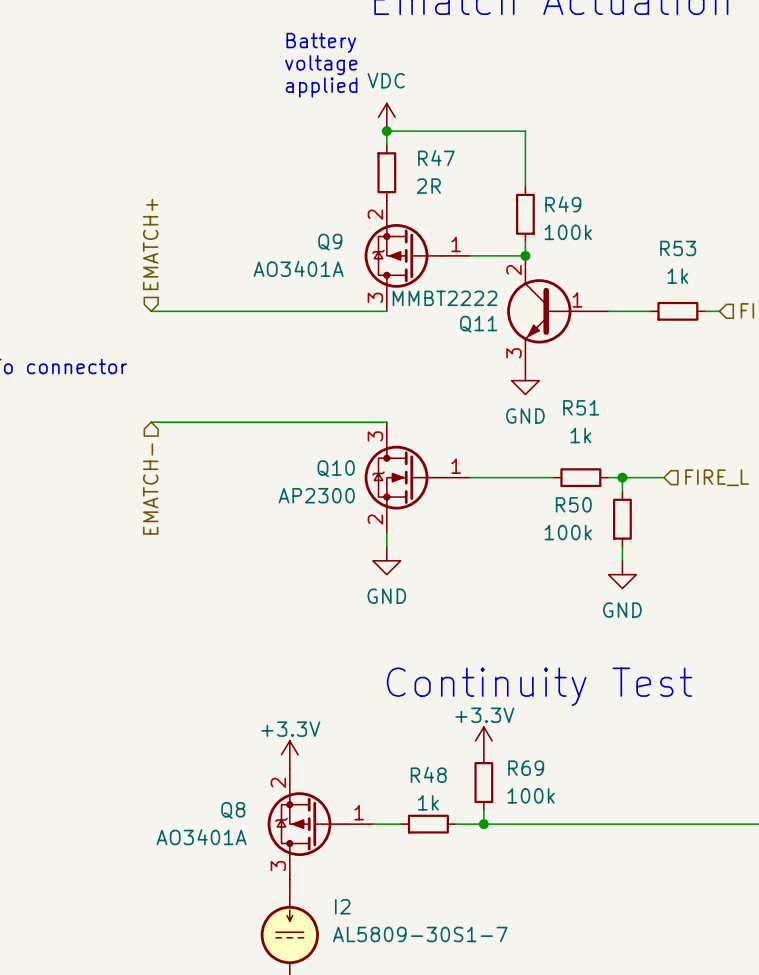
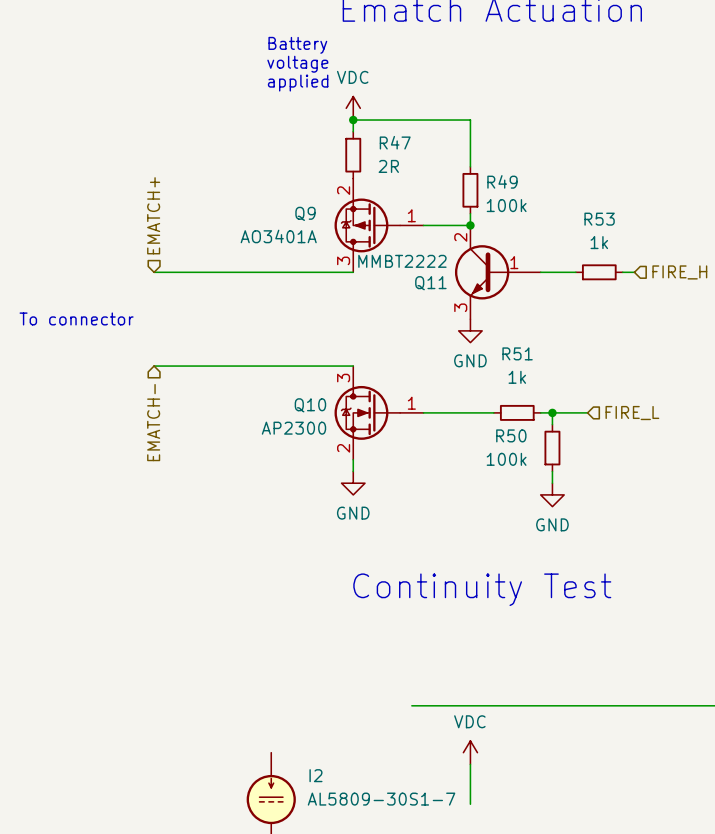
power symbol: +3.3V (483, 740) -> none
power symbol: +3.3V (289, 754) -> none
R69: 100k (483, 782) -> none
wire: (483, 810) (483, 824) -> none
Q8: AO3401A (320, 824) -> none
wire: (372, 824) (400, 824) -> none
R48: 1k (428, 824) -> none
junction: (483, 824) -> none
power symbol: none -> VDC (470, 752)
wire: none -> (470, 764) (470, 804)

